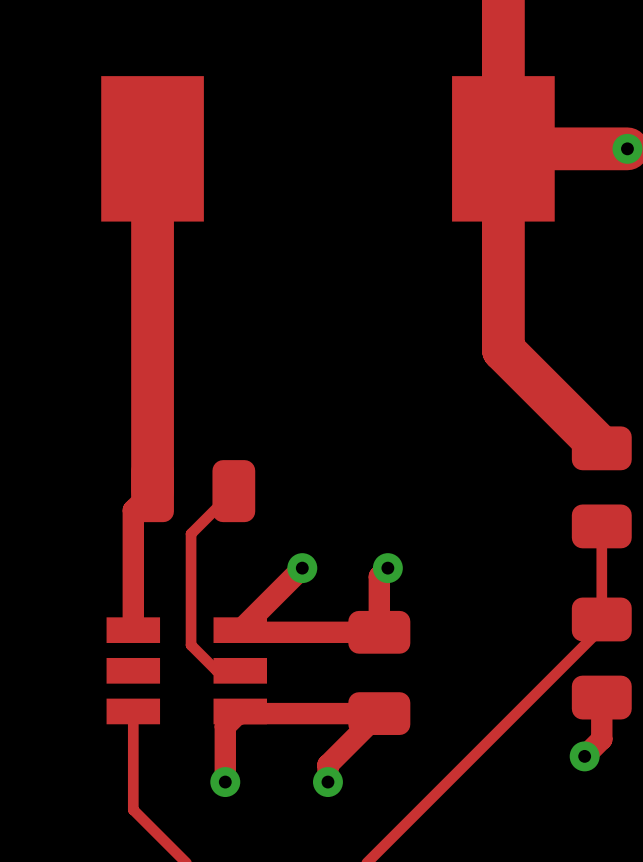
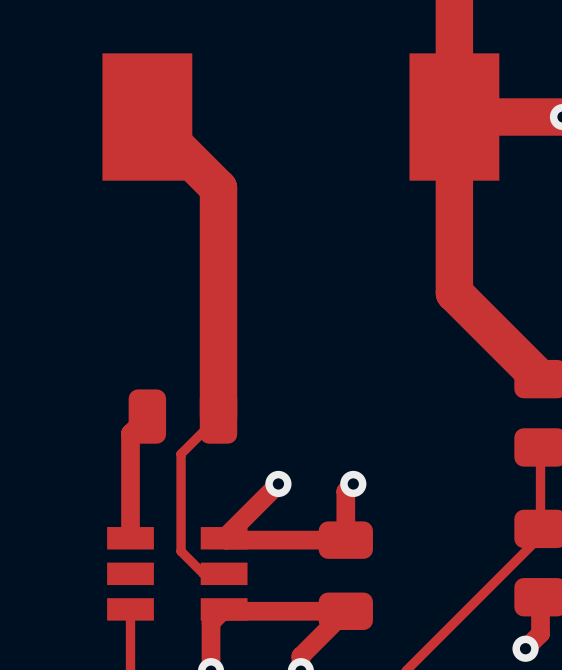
top track: (152, 148) (152, 491) -> (147, 117) (218, 188) (218, 416)

